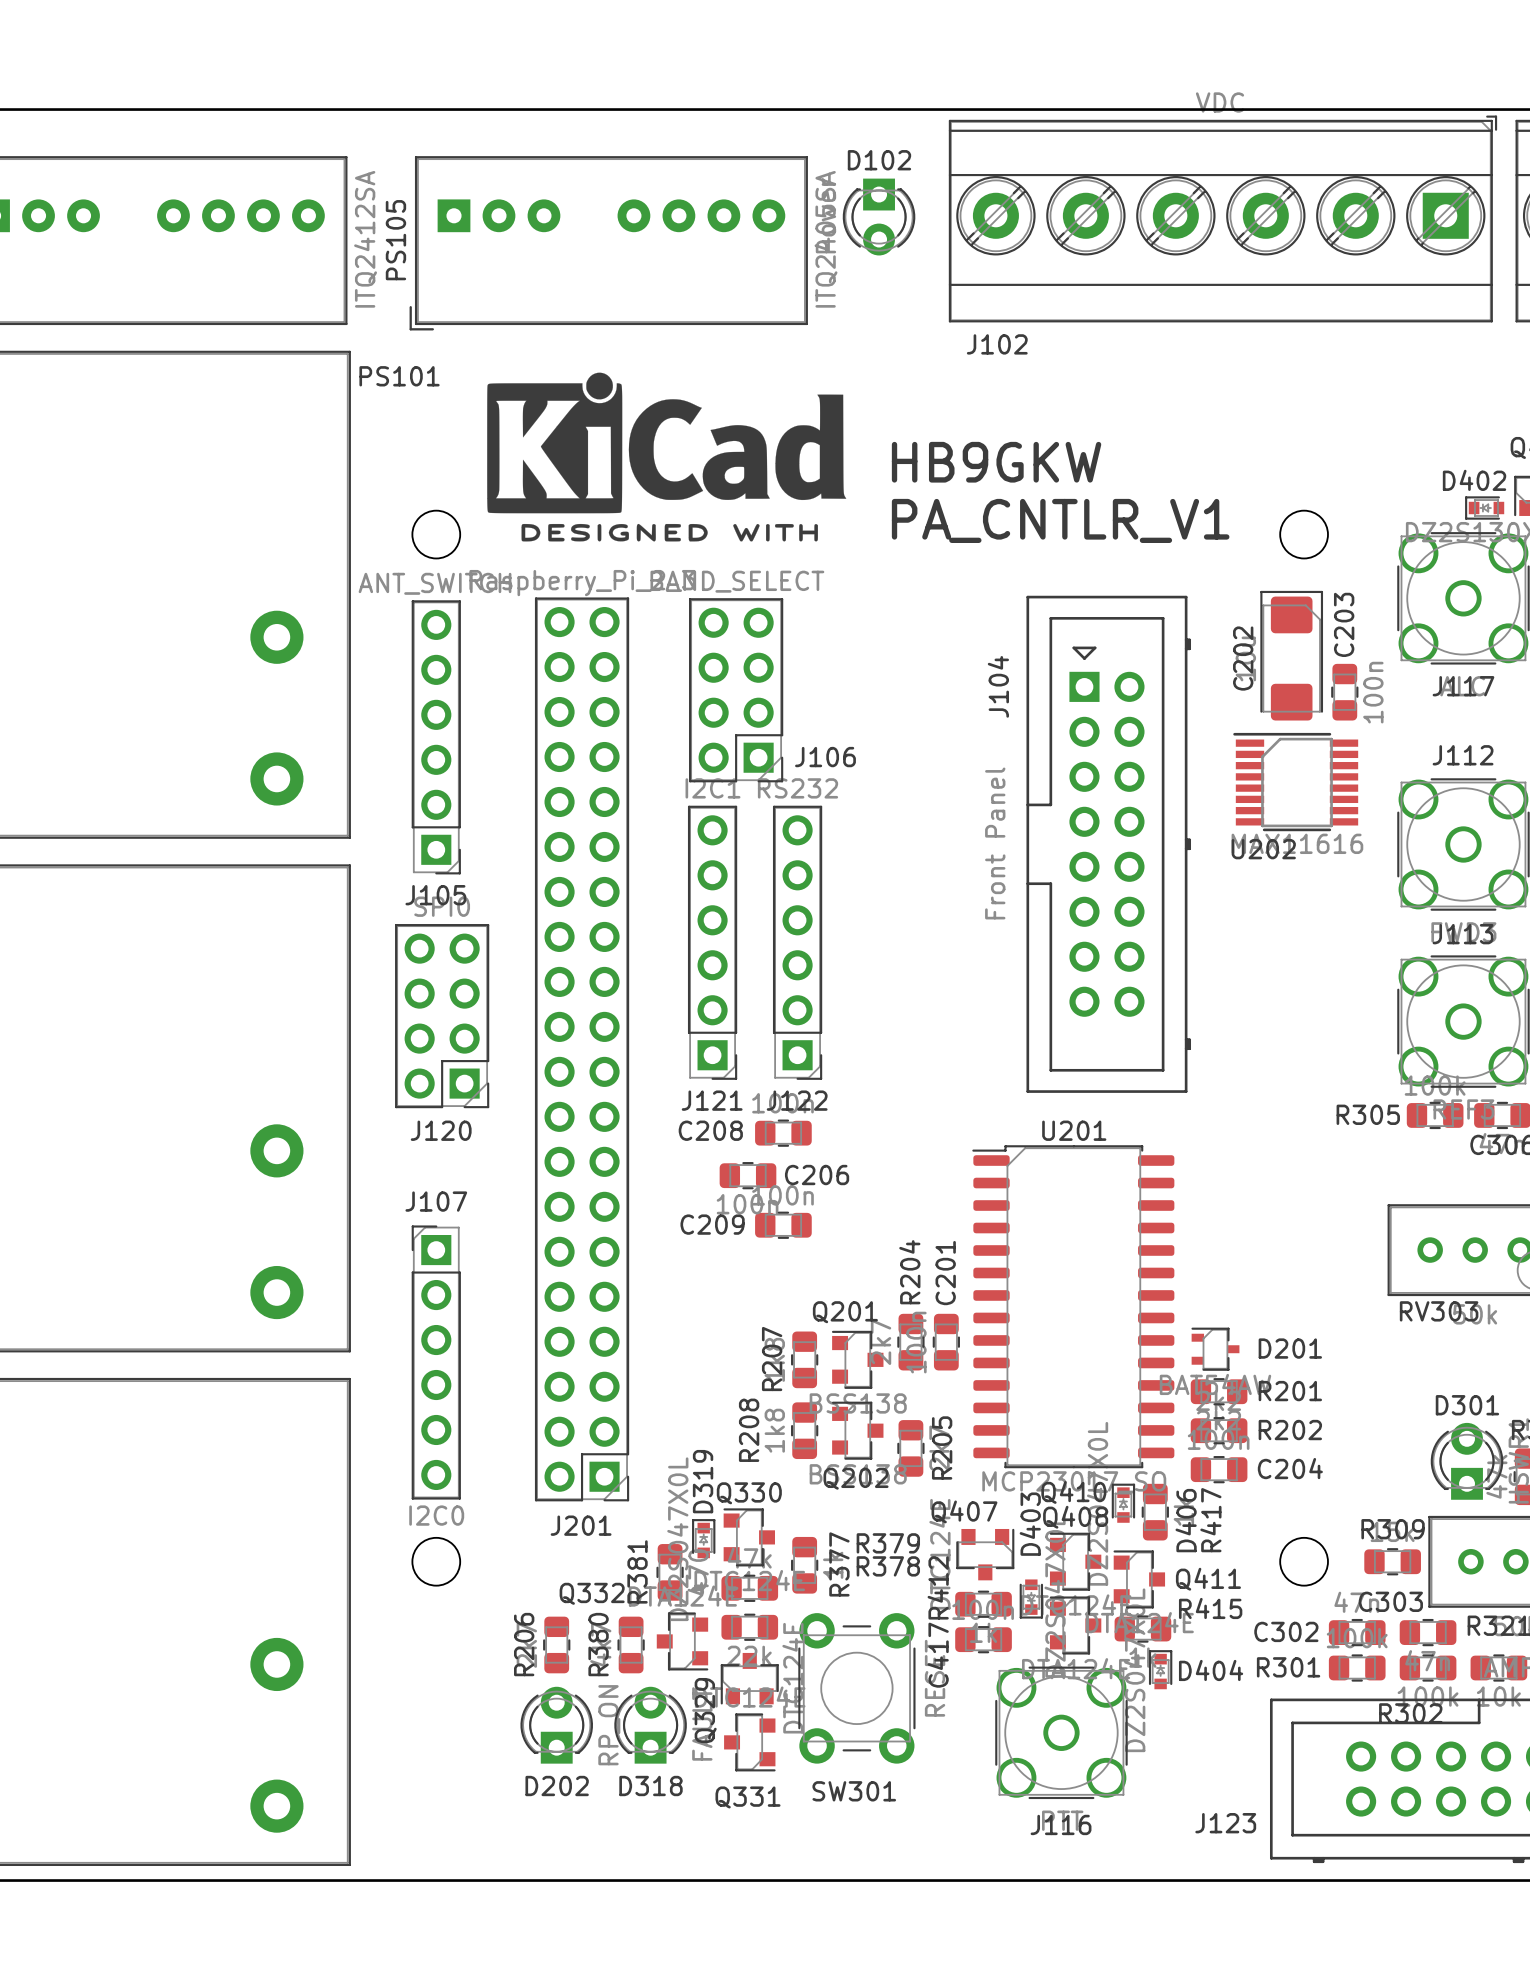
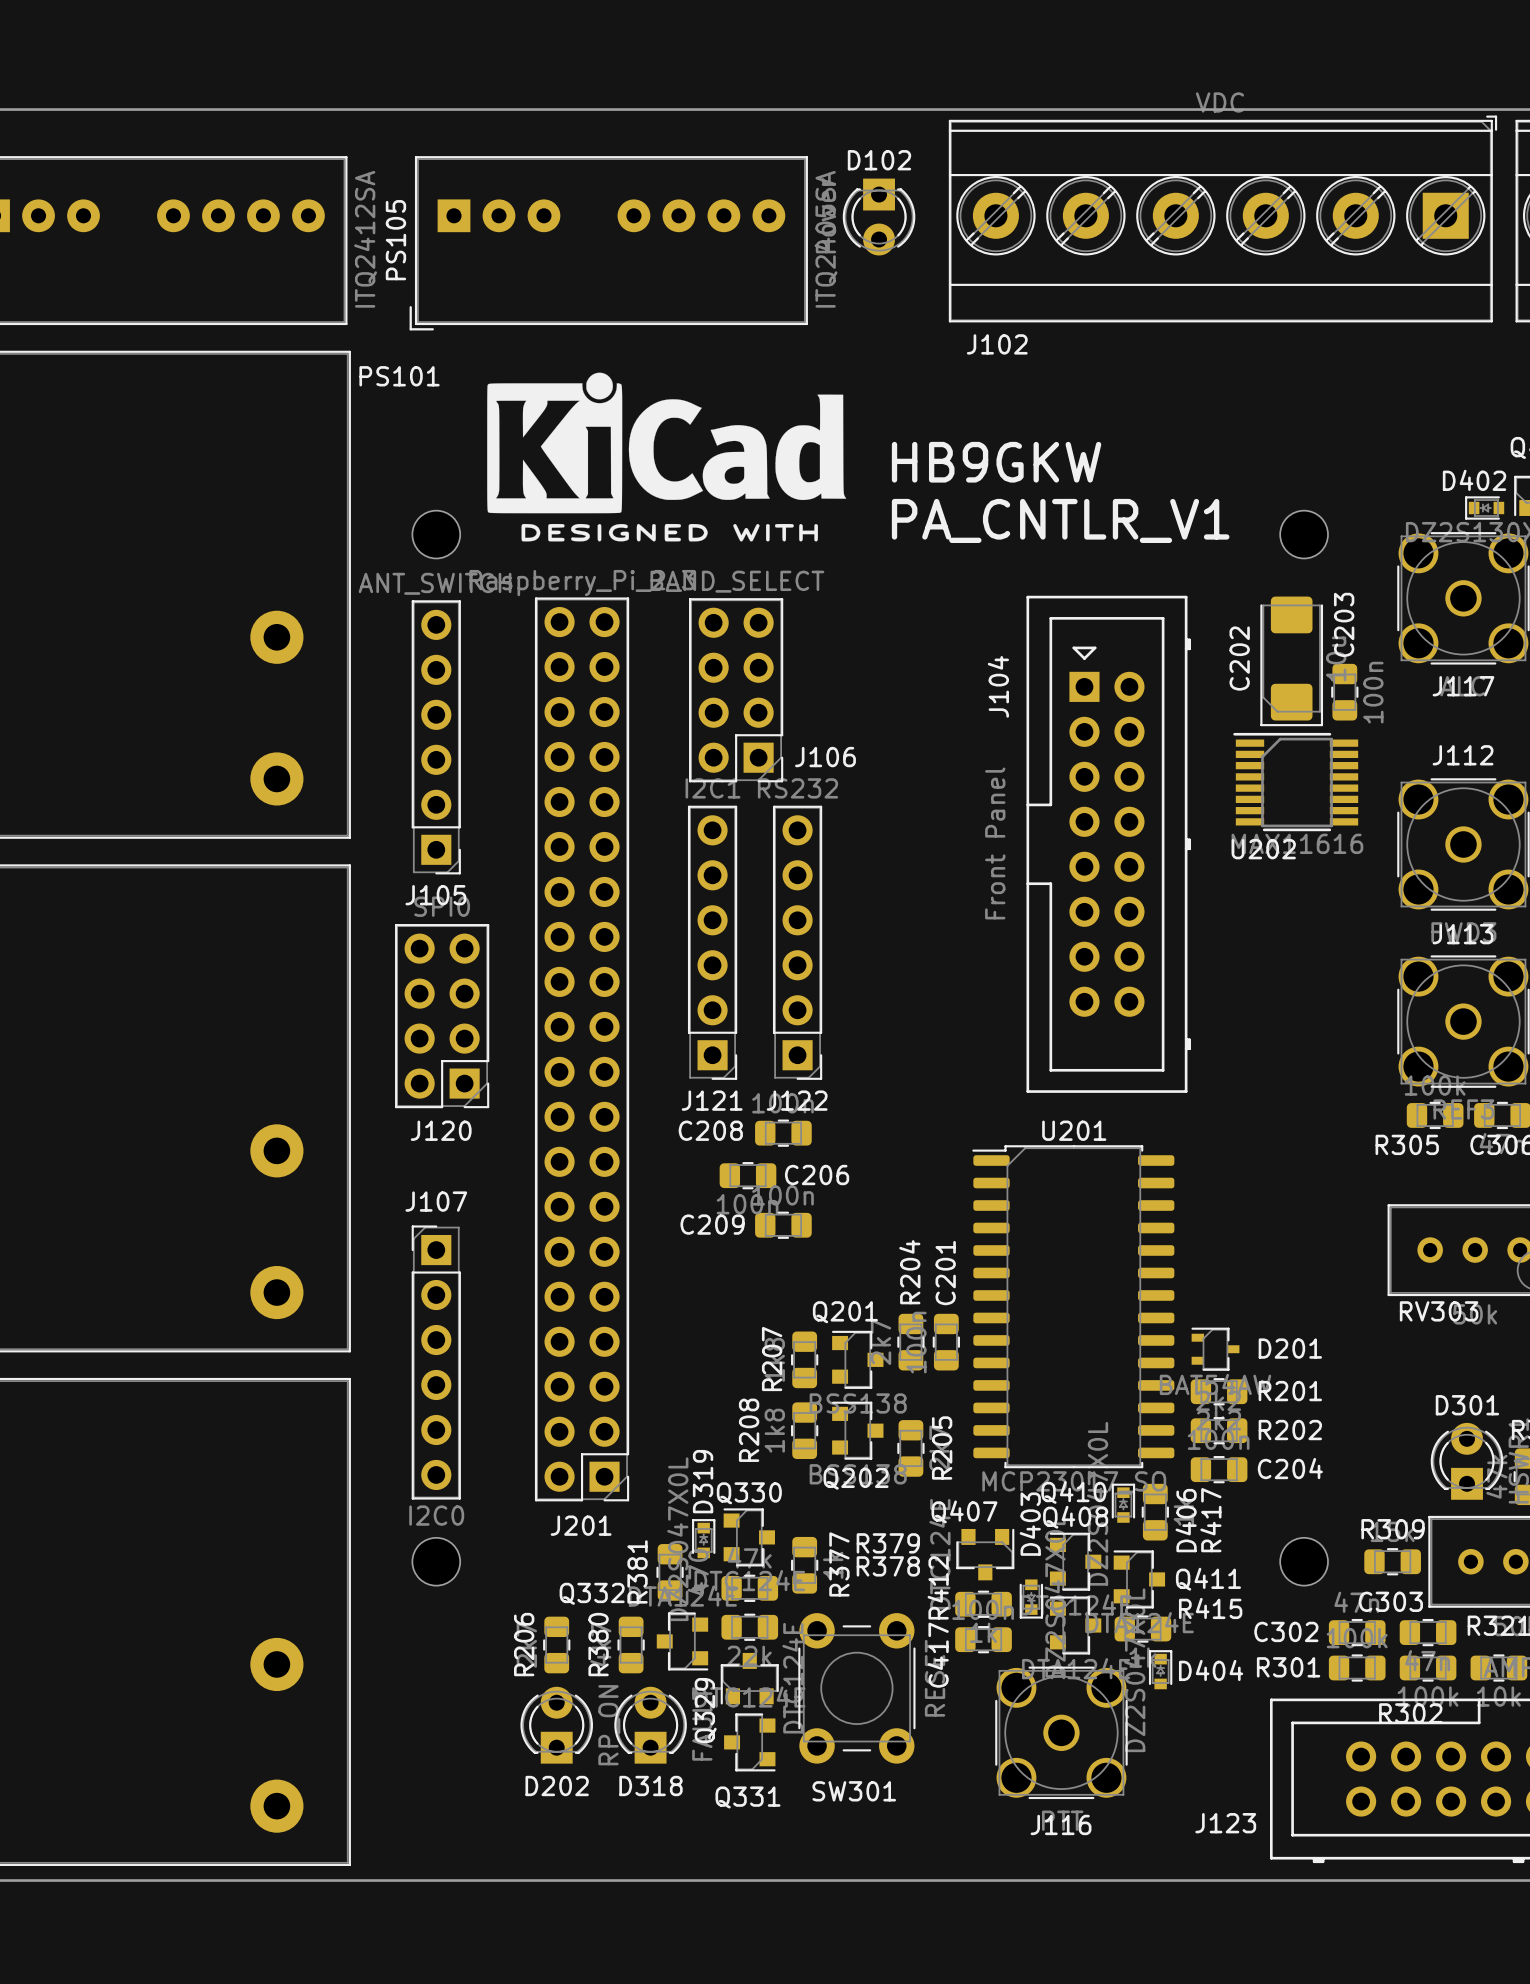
C202 rotation: 0° (1291, 655) -> 180° (1291, 661)
R305 name position: R305 (1368, 1114) -> R305 (1407, 1144)

